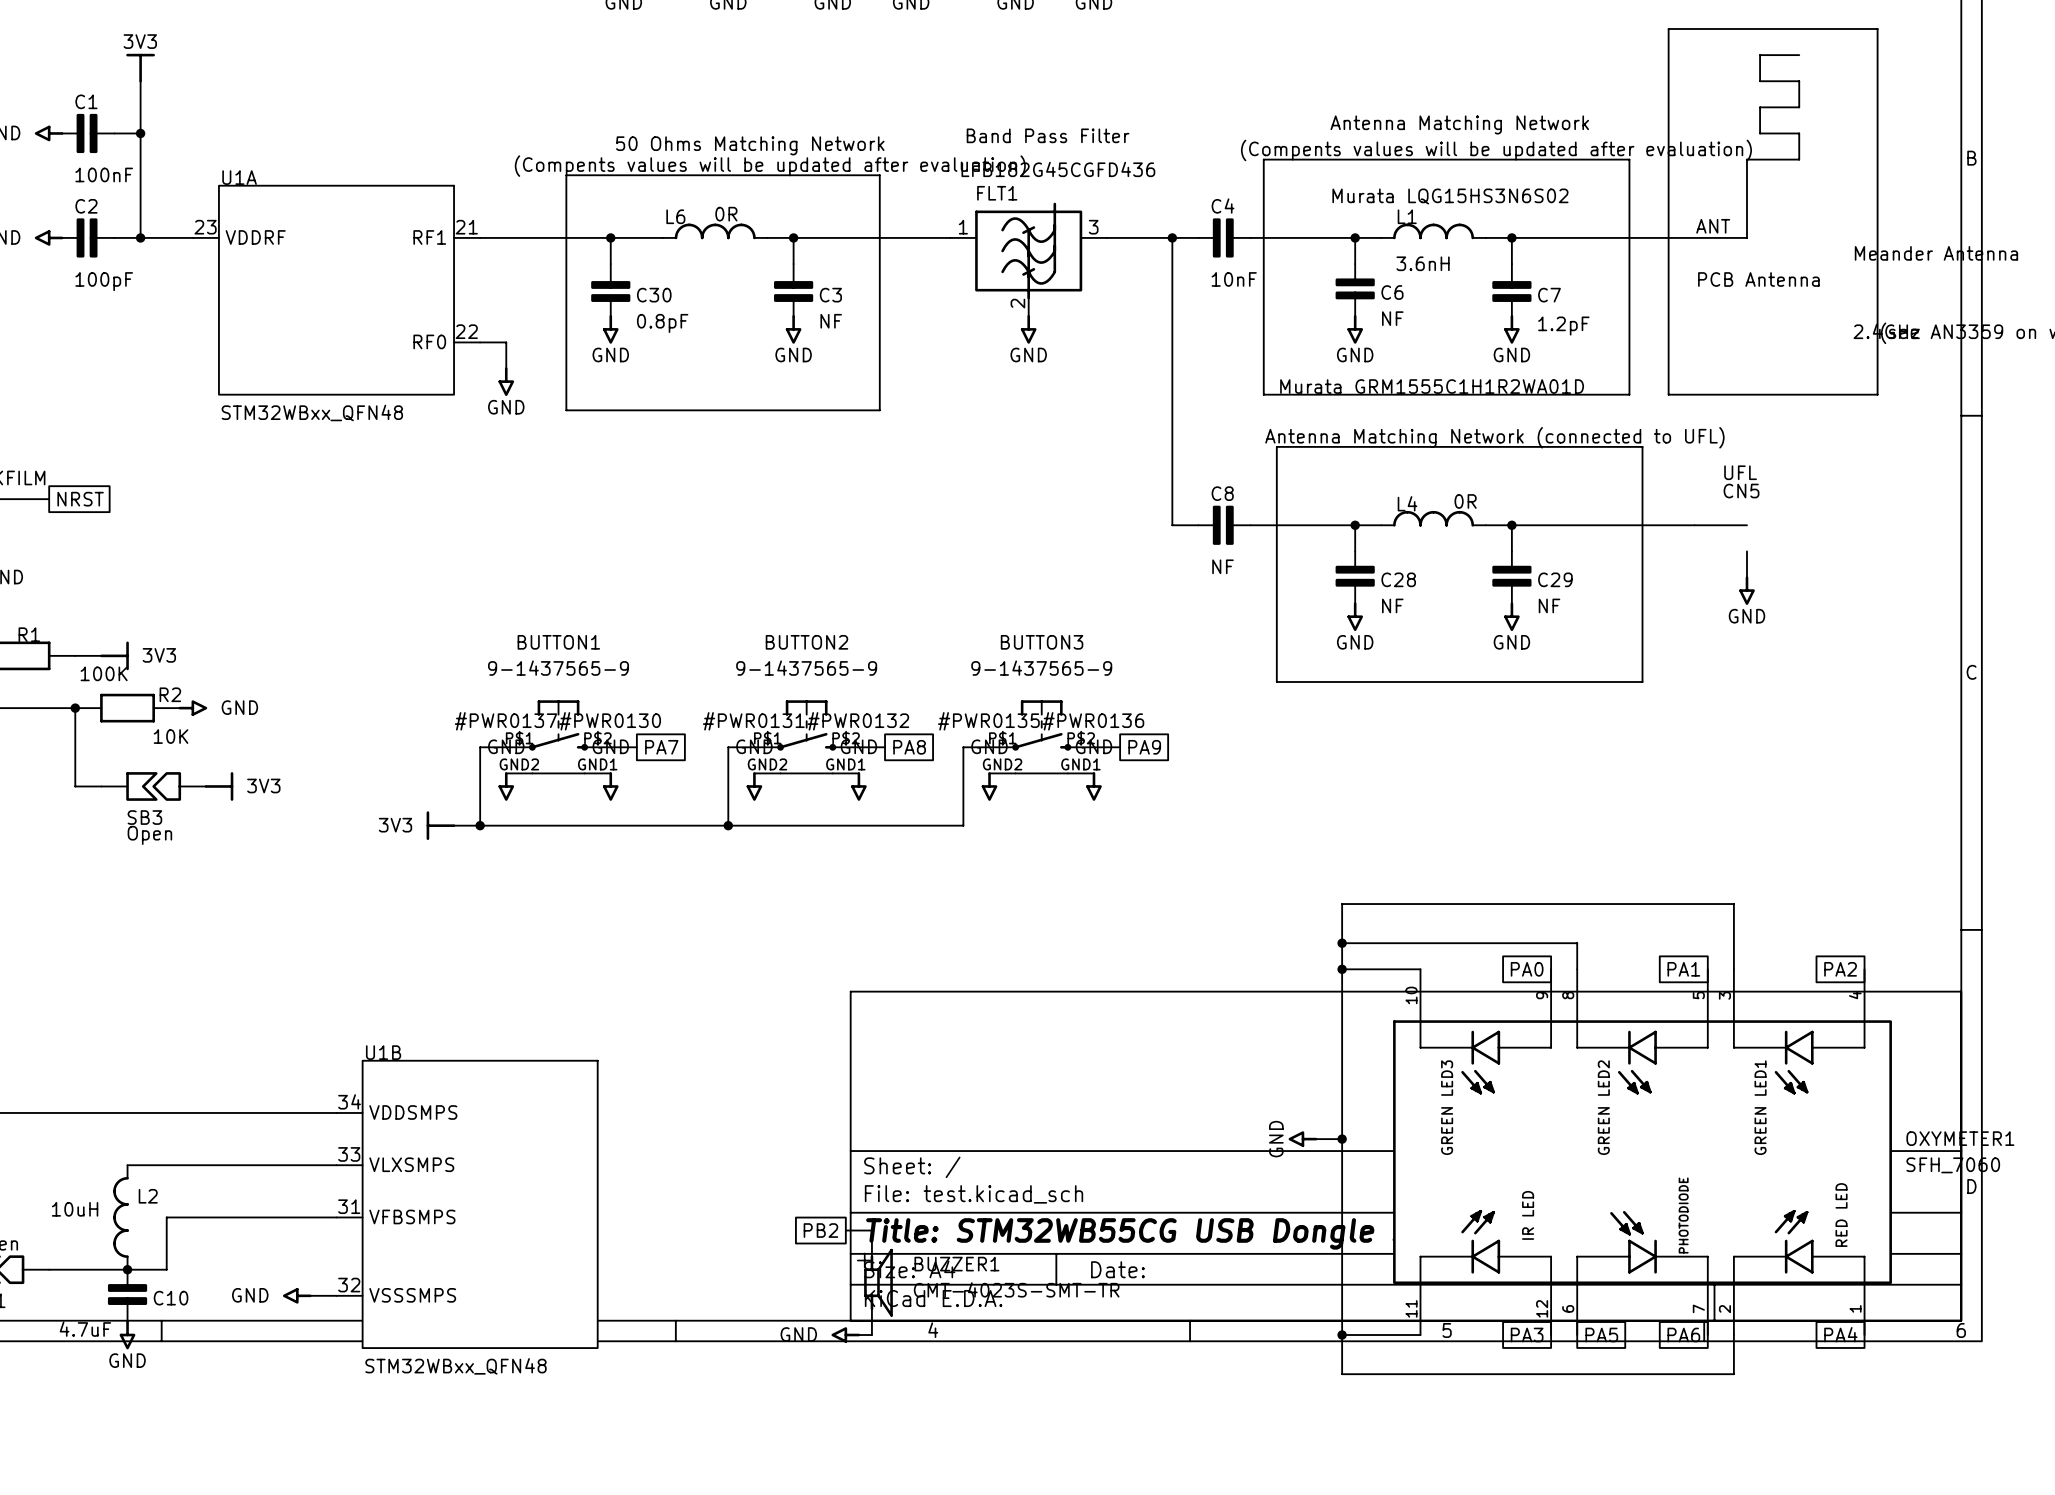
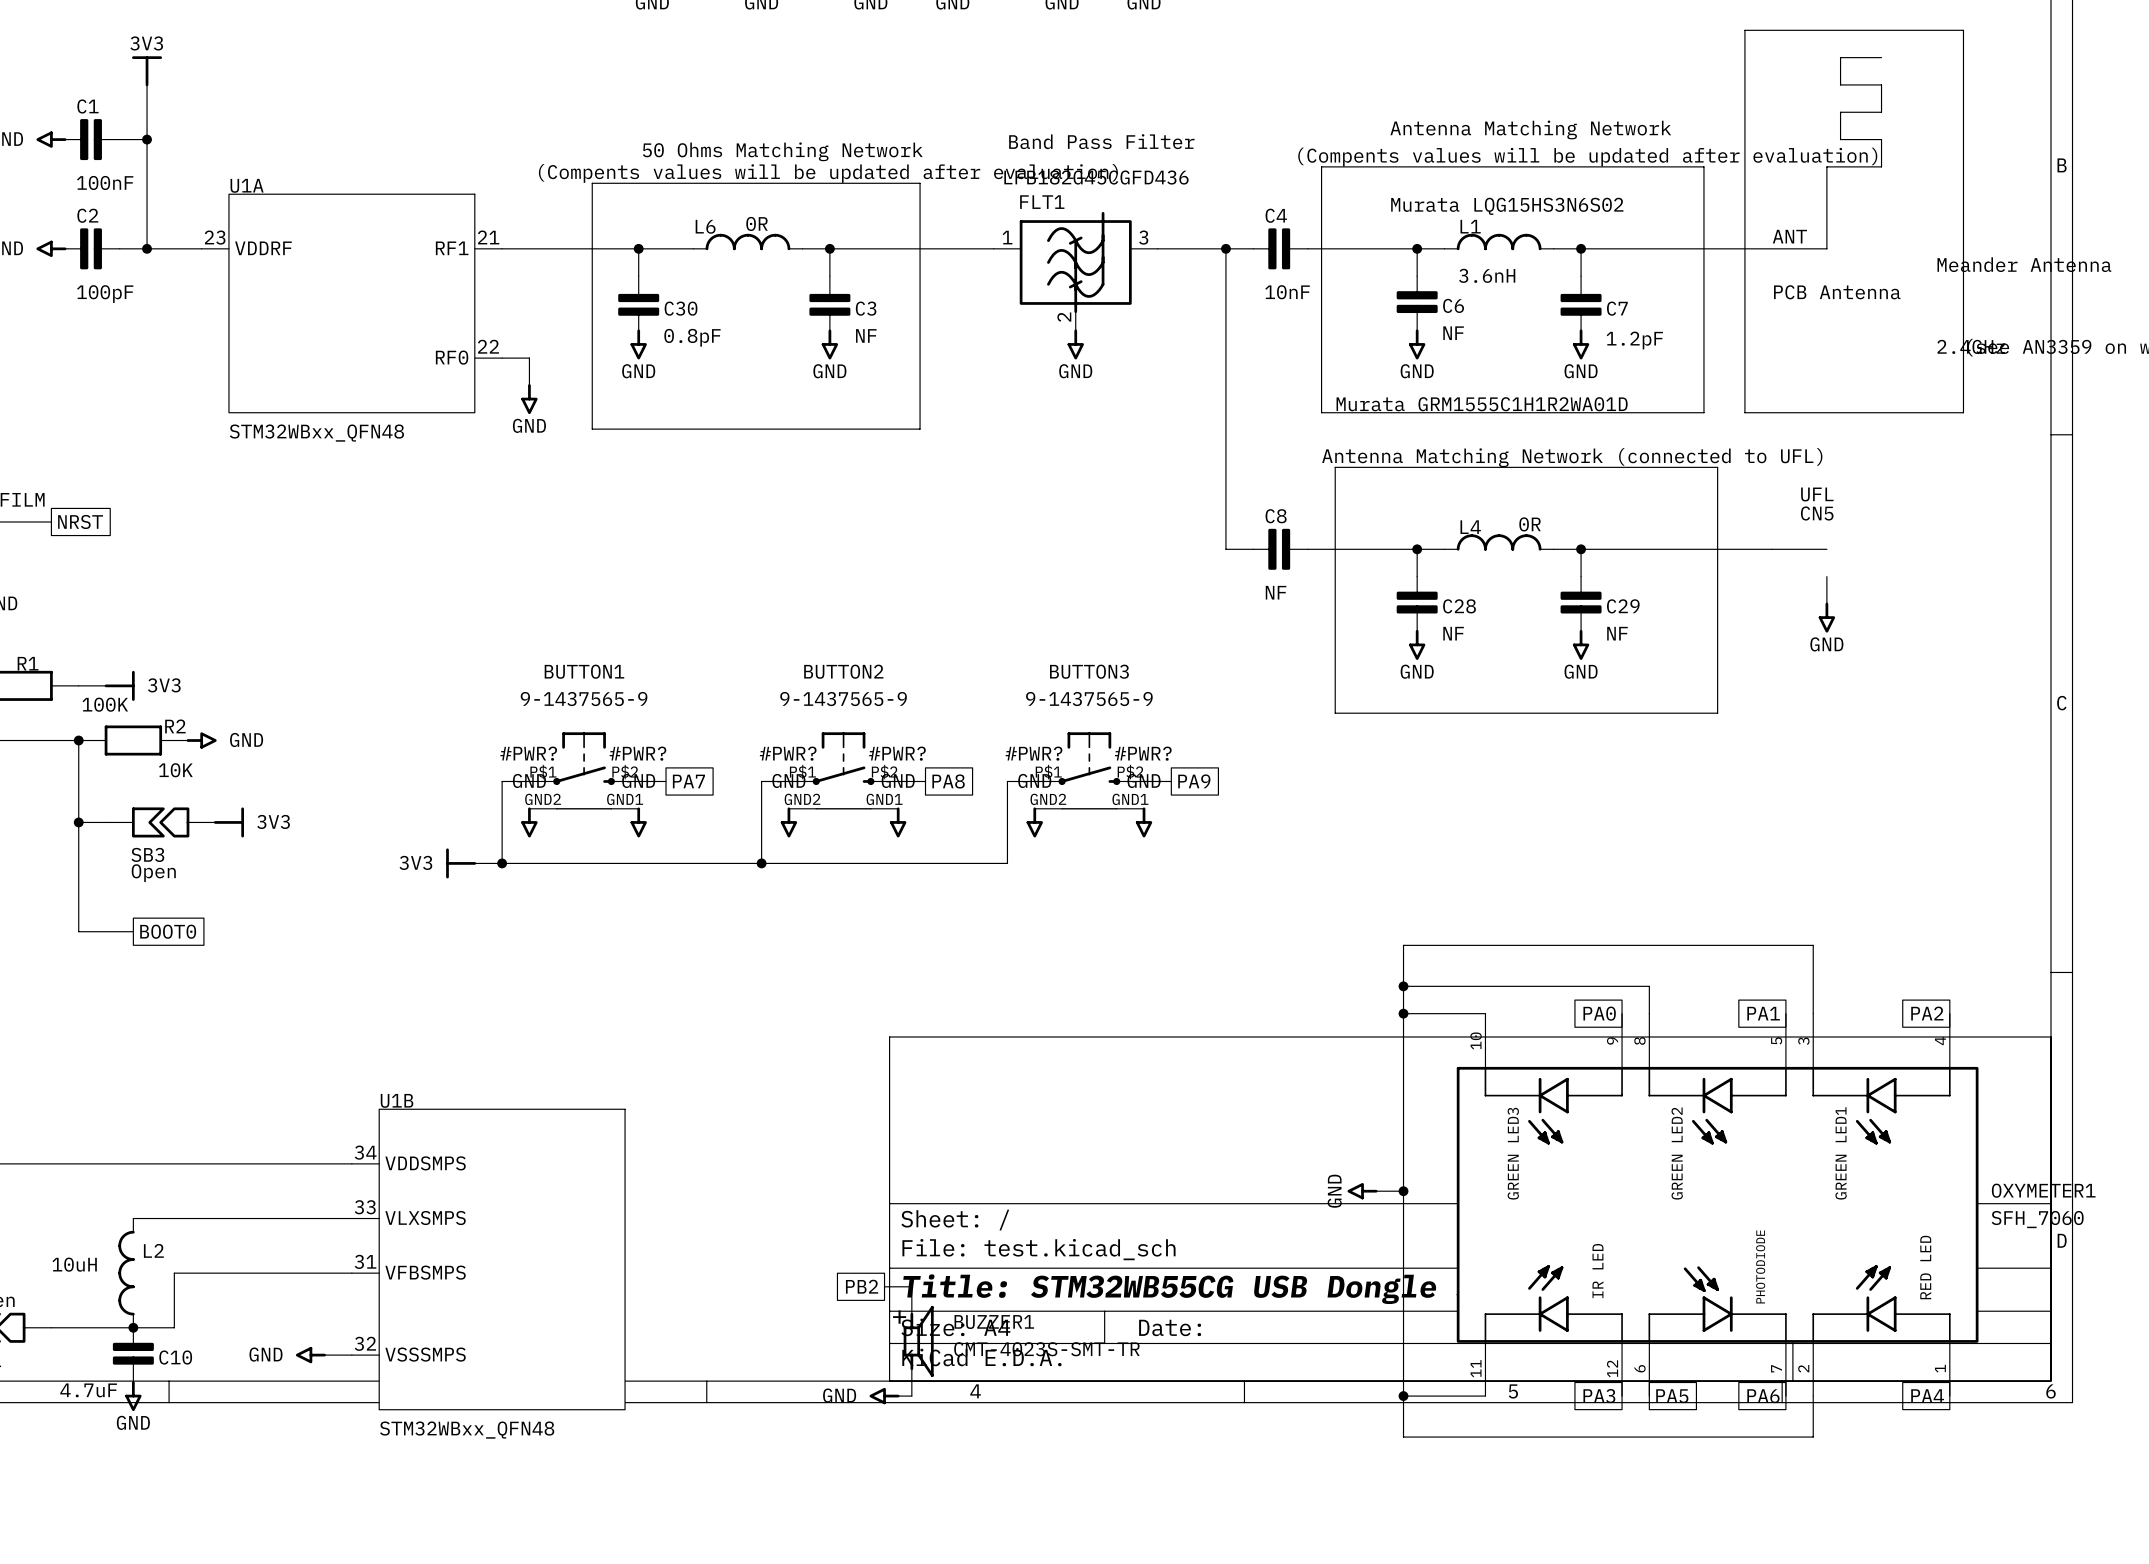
#PWR0137 name: #PWR0137 (505, 721) -> #PWR? (528, 753)
#PWR0130 name: #PWR0130 (610, 721) -> #PWR? (637, 753)
#PWR0131 name: #PWR0131 (753, 721) -> #PWR? (788, 753)
#PWR0132 name: #PWR0132 (858, 721) -> #PWR? (897, 753)
#PWR0135 name: #PWR0135 (988, 721) -> #PWR? (1034, 753)
#PWR0136 name: #PWR0136 (1093, 721) -> #PWR? (1143, 753)
wire: none -> (78, 822) (78, 931) (133, 931)
junction: none -> (78, 822)
global label: none -> BOOT0 (168, 931)

